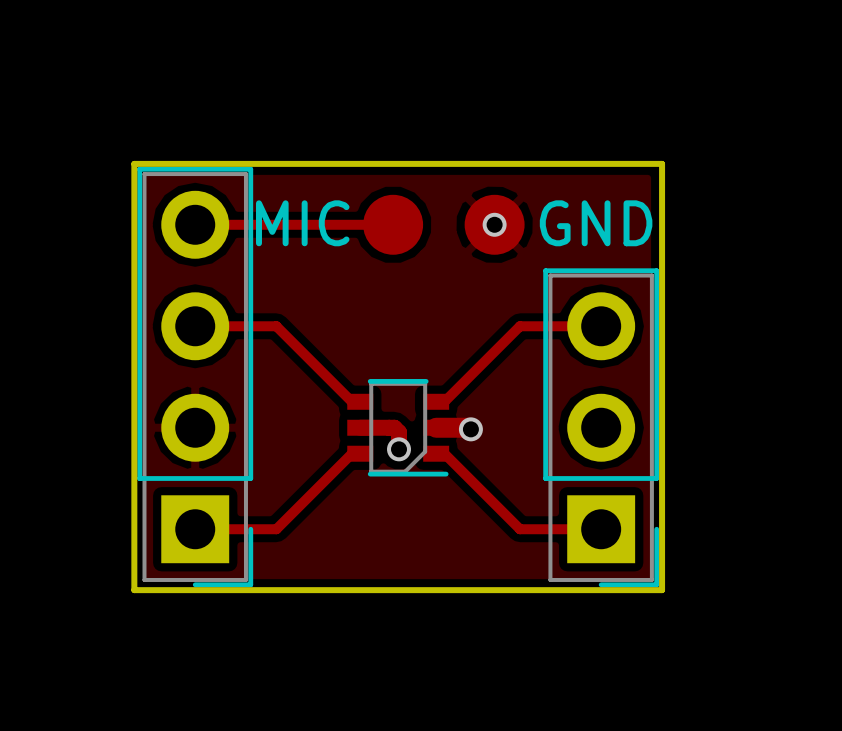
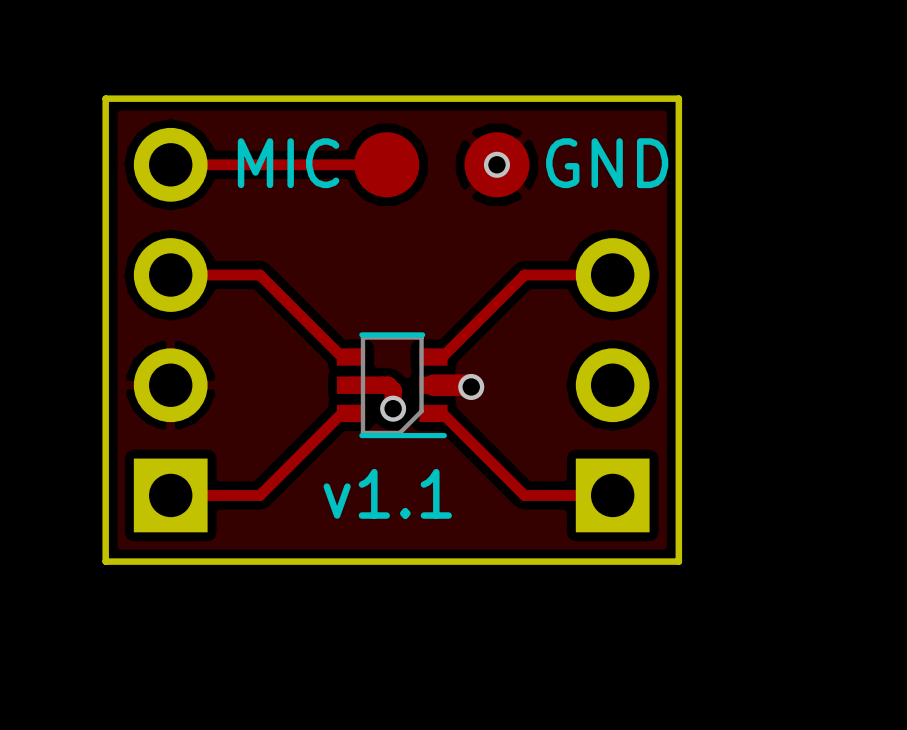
part side: top (195, 377) -> bottom (170, 330)
part side: top (601, 427) -> bottom (612, 385)
text: none -> v1.1 (387, 493)

